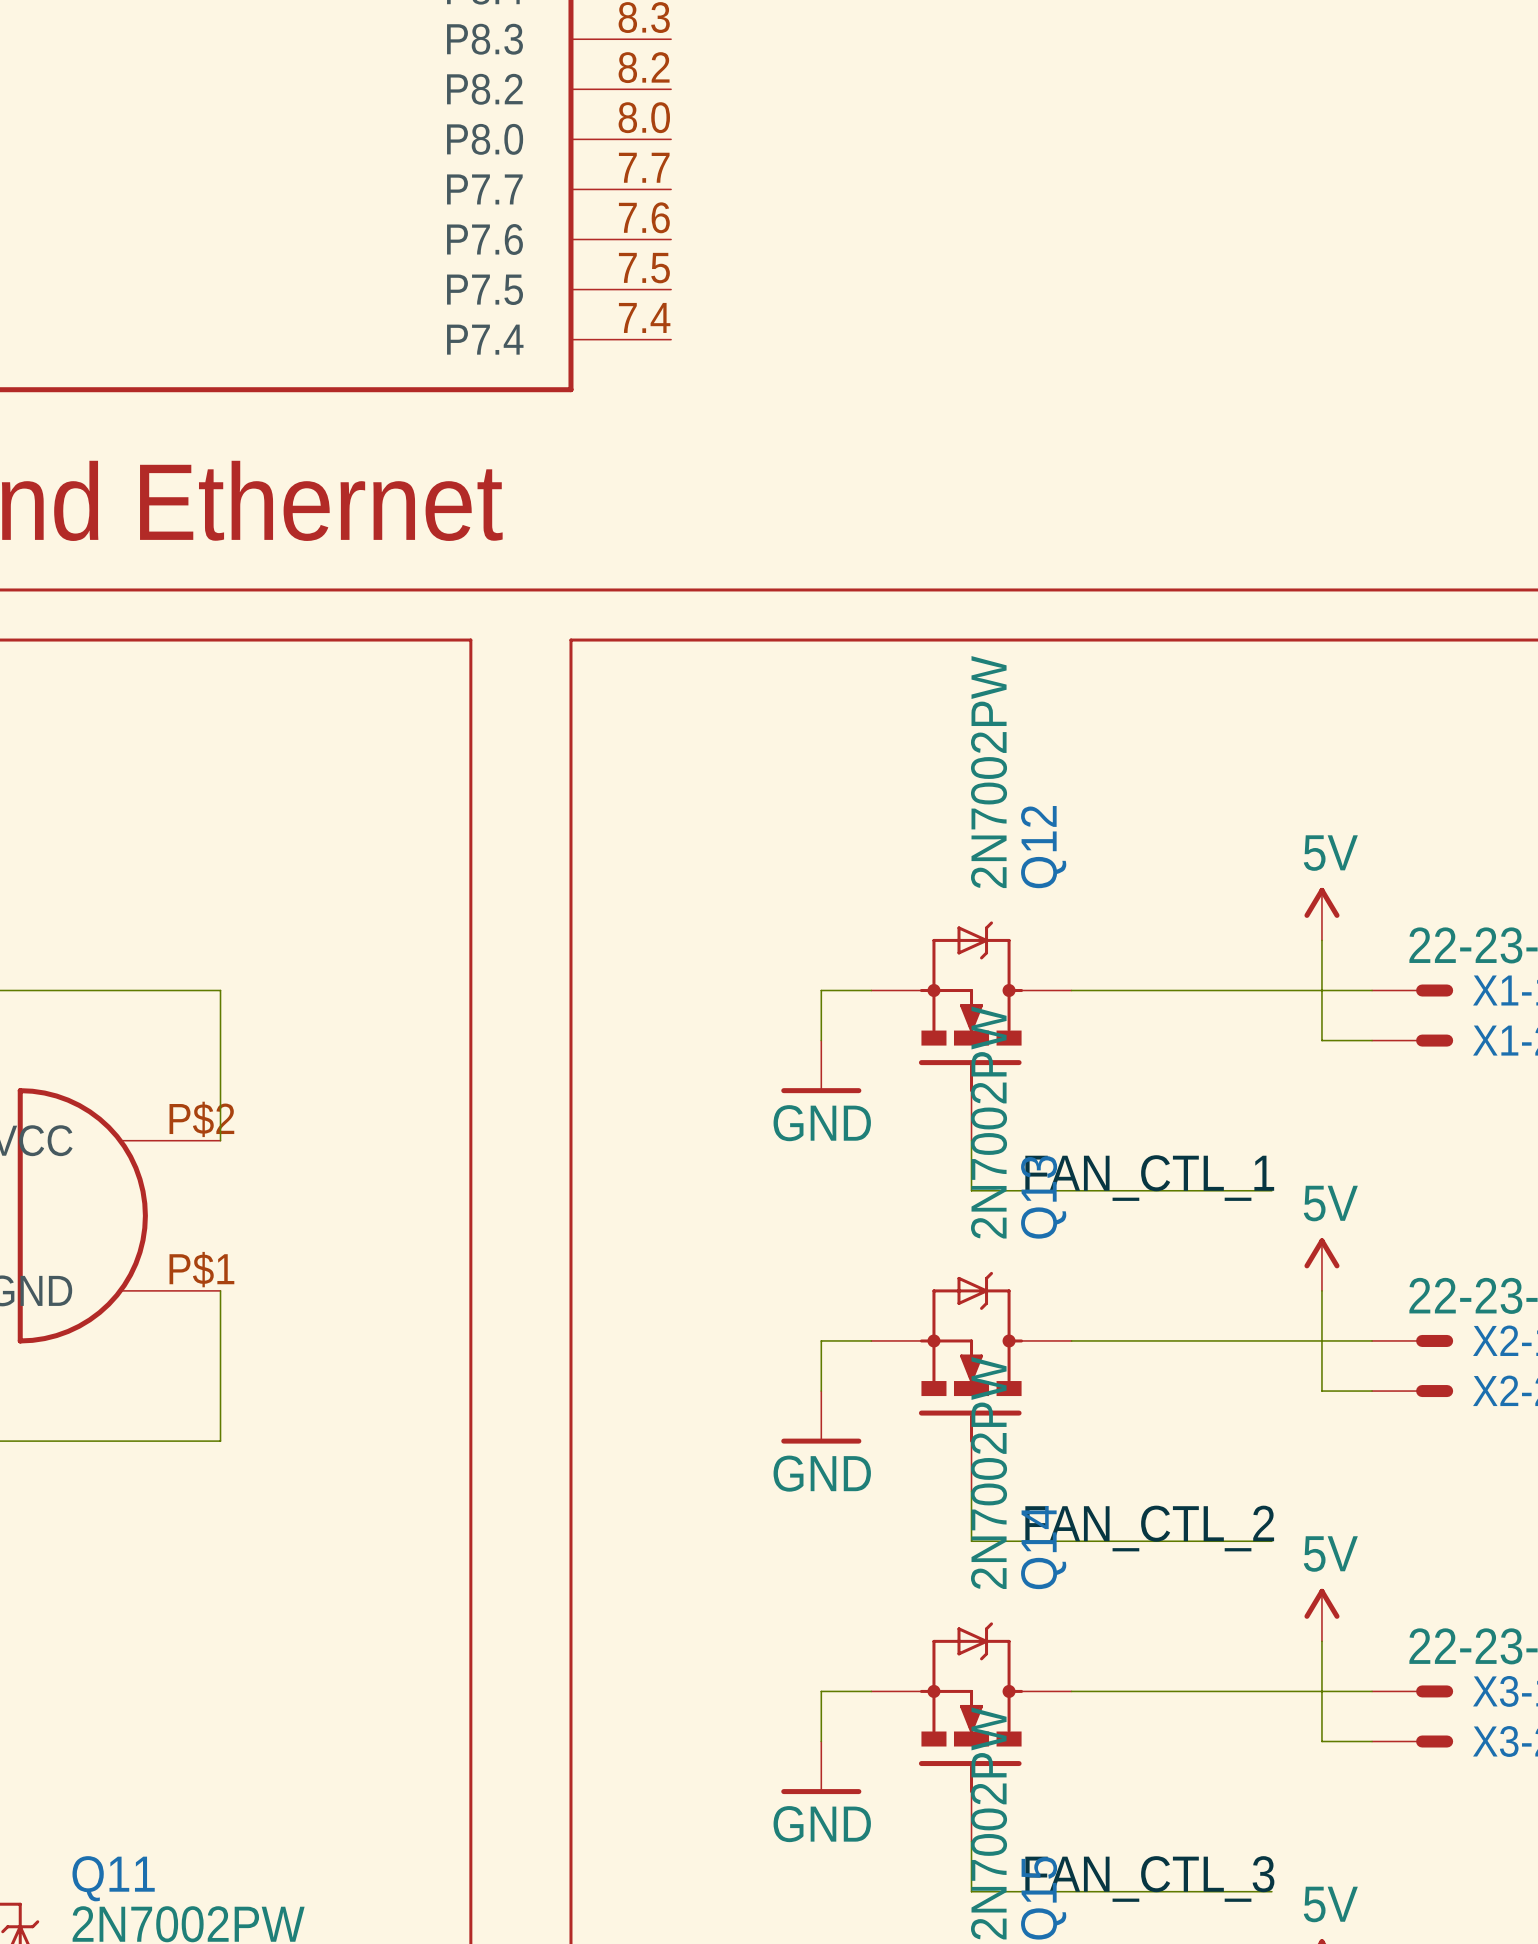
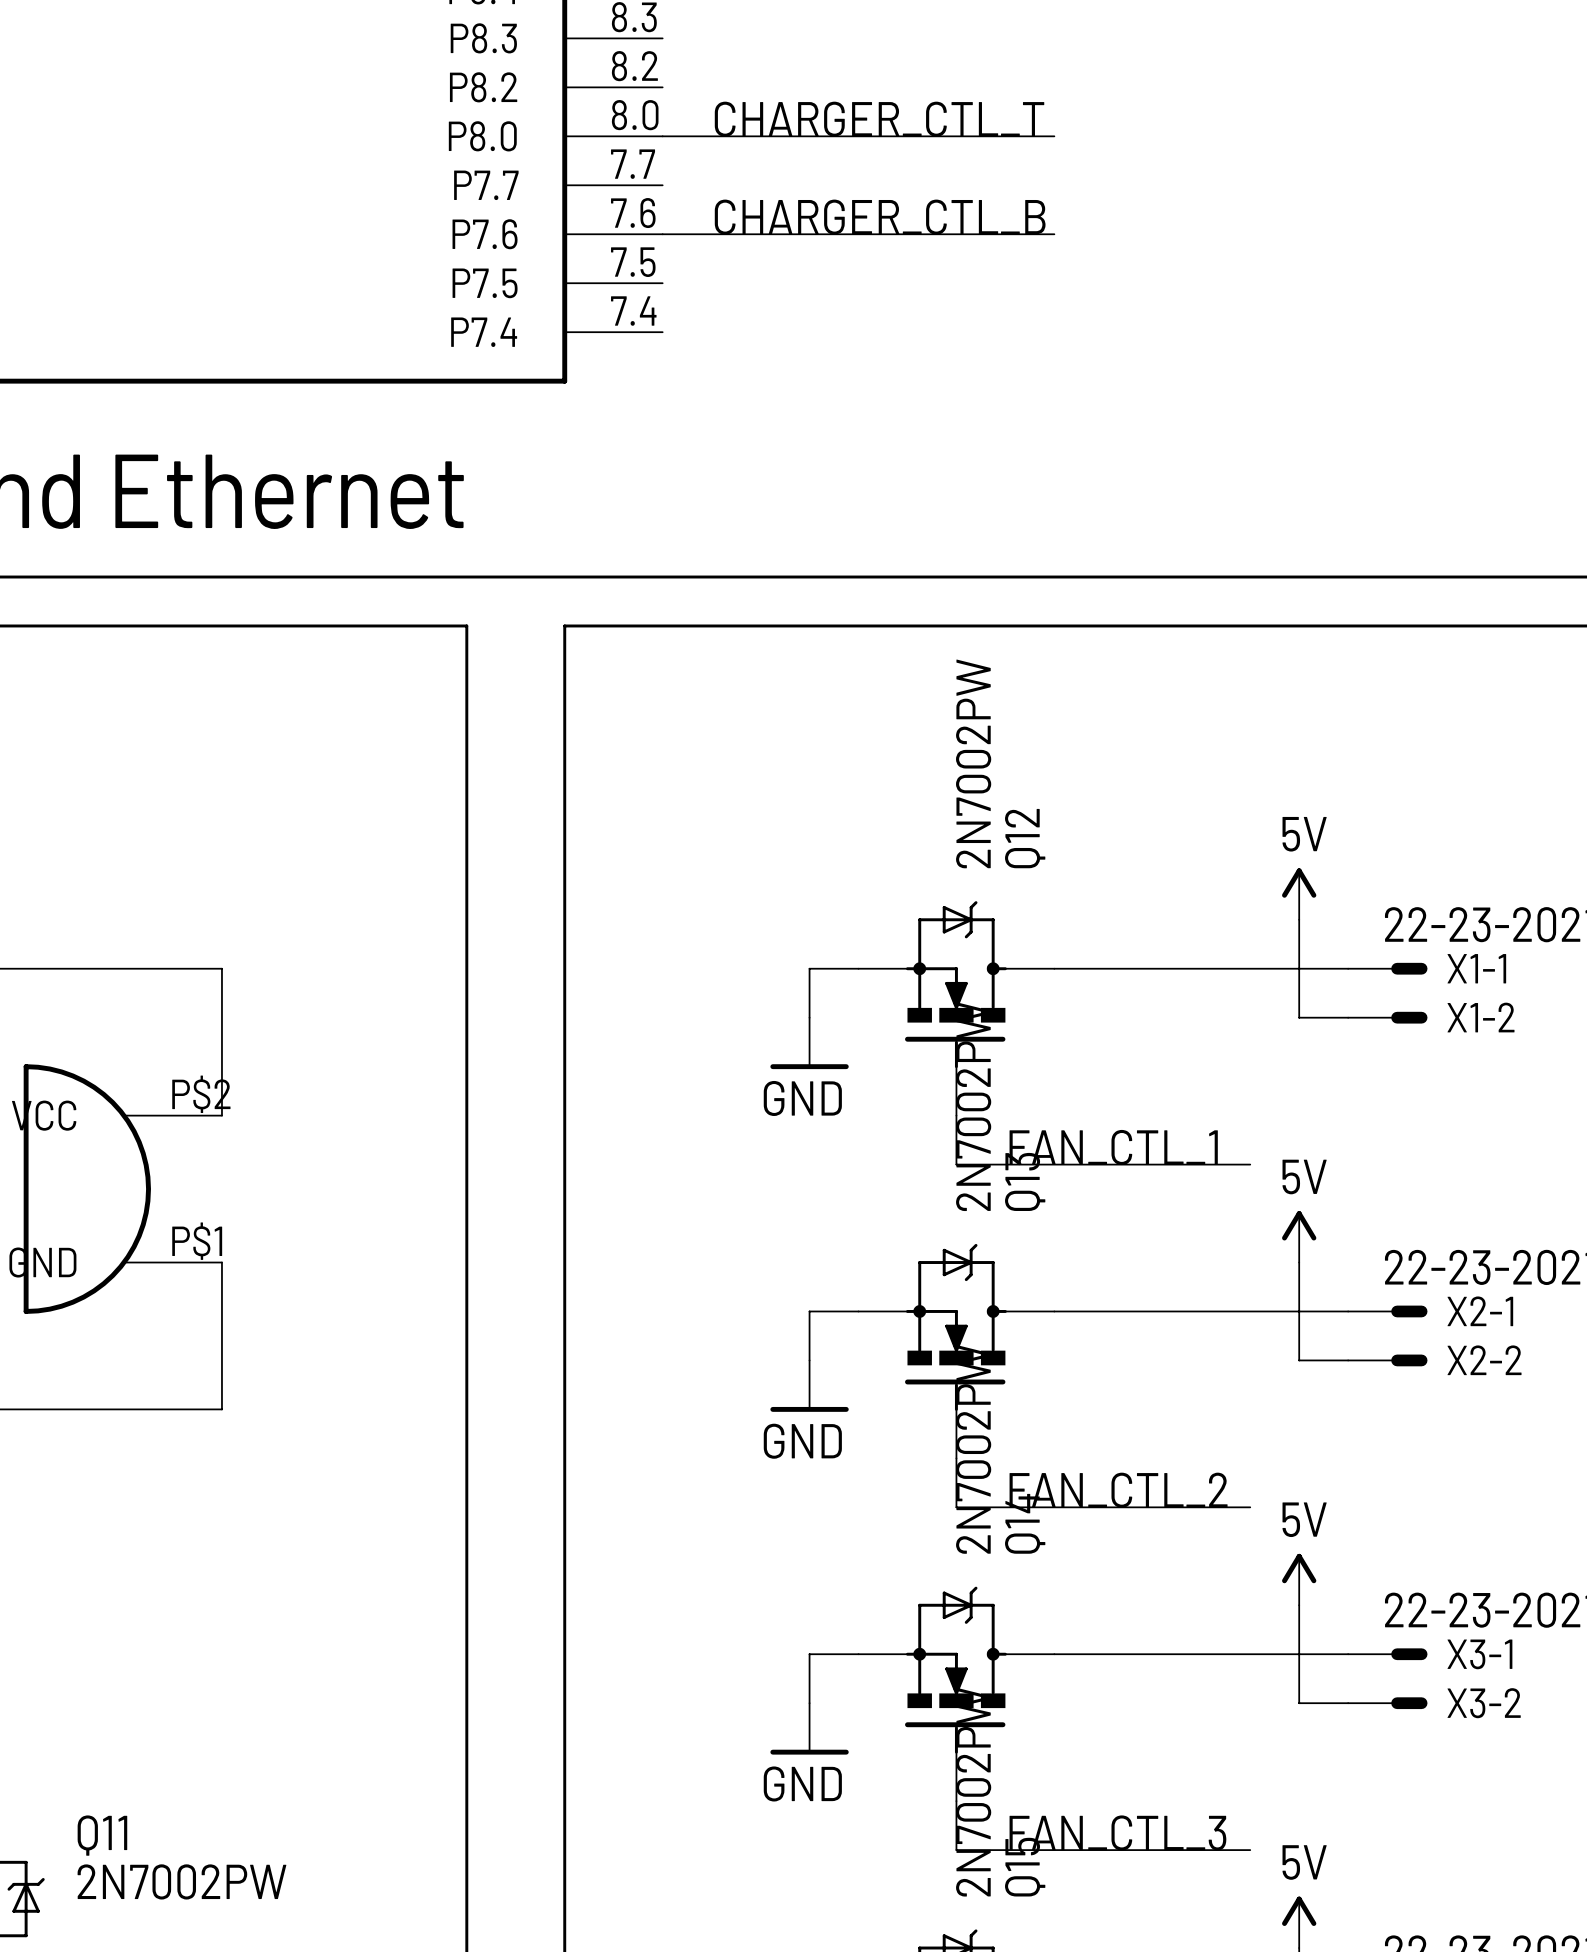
label: none -> CHARGER_CTL_T (879, 119)
wire: none -> (662, 136) (1054, 136)
label: none -> CHARGER_CTL_B (880, 217)
wire: none -> (662, 234) (1054, 234)

